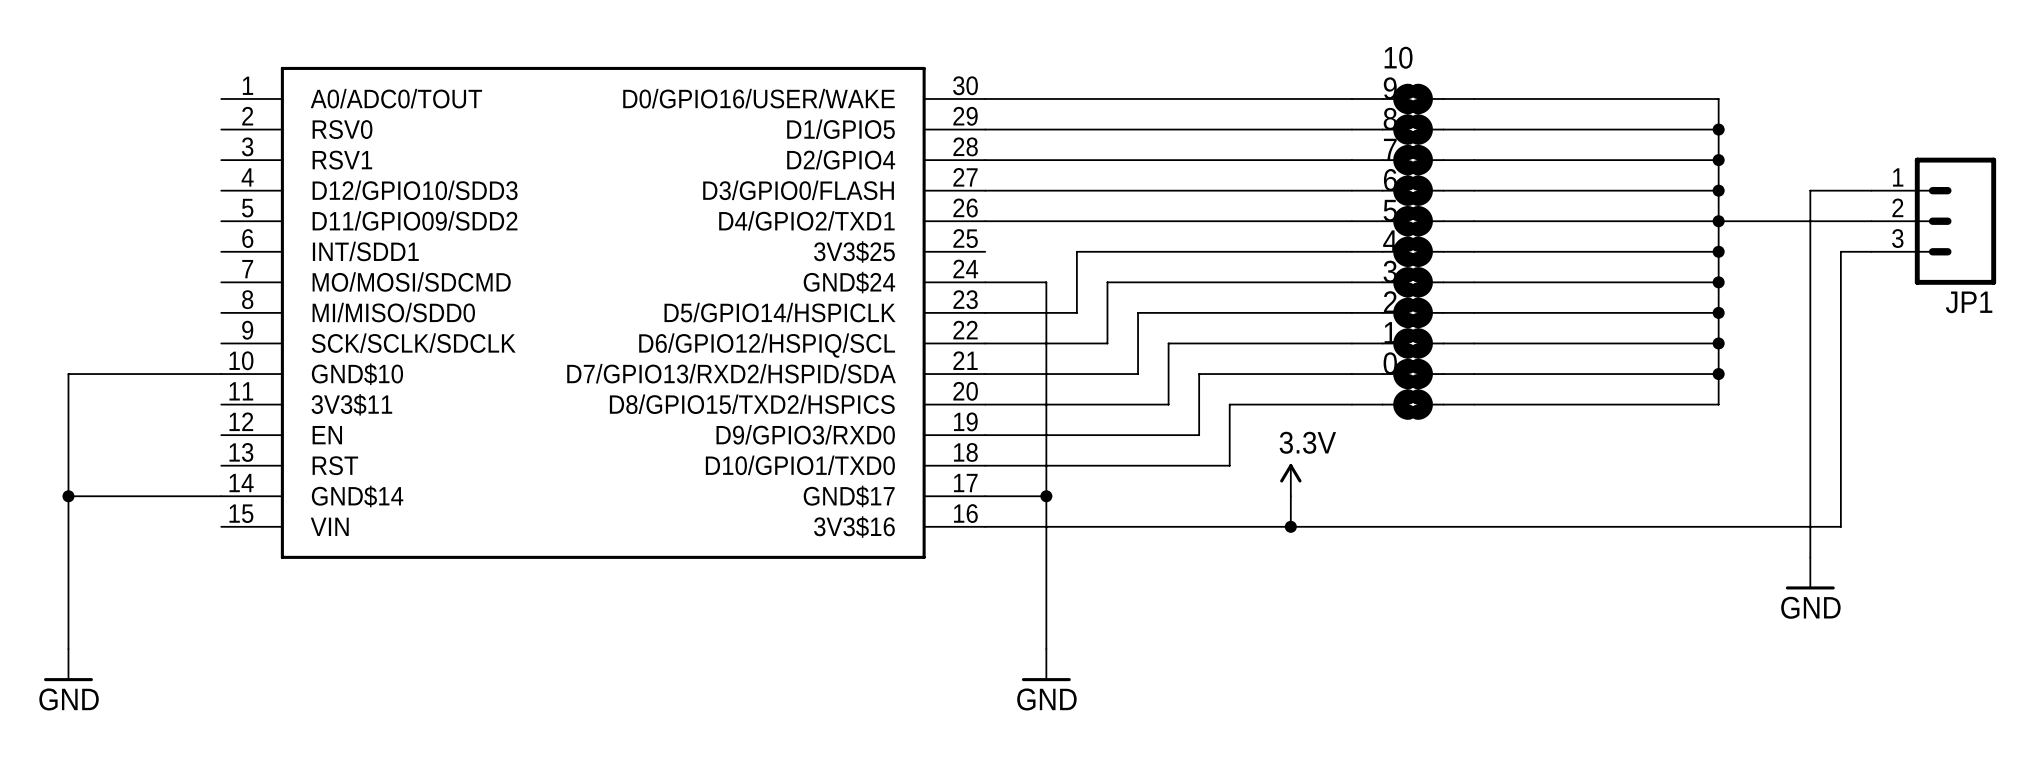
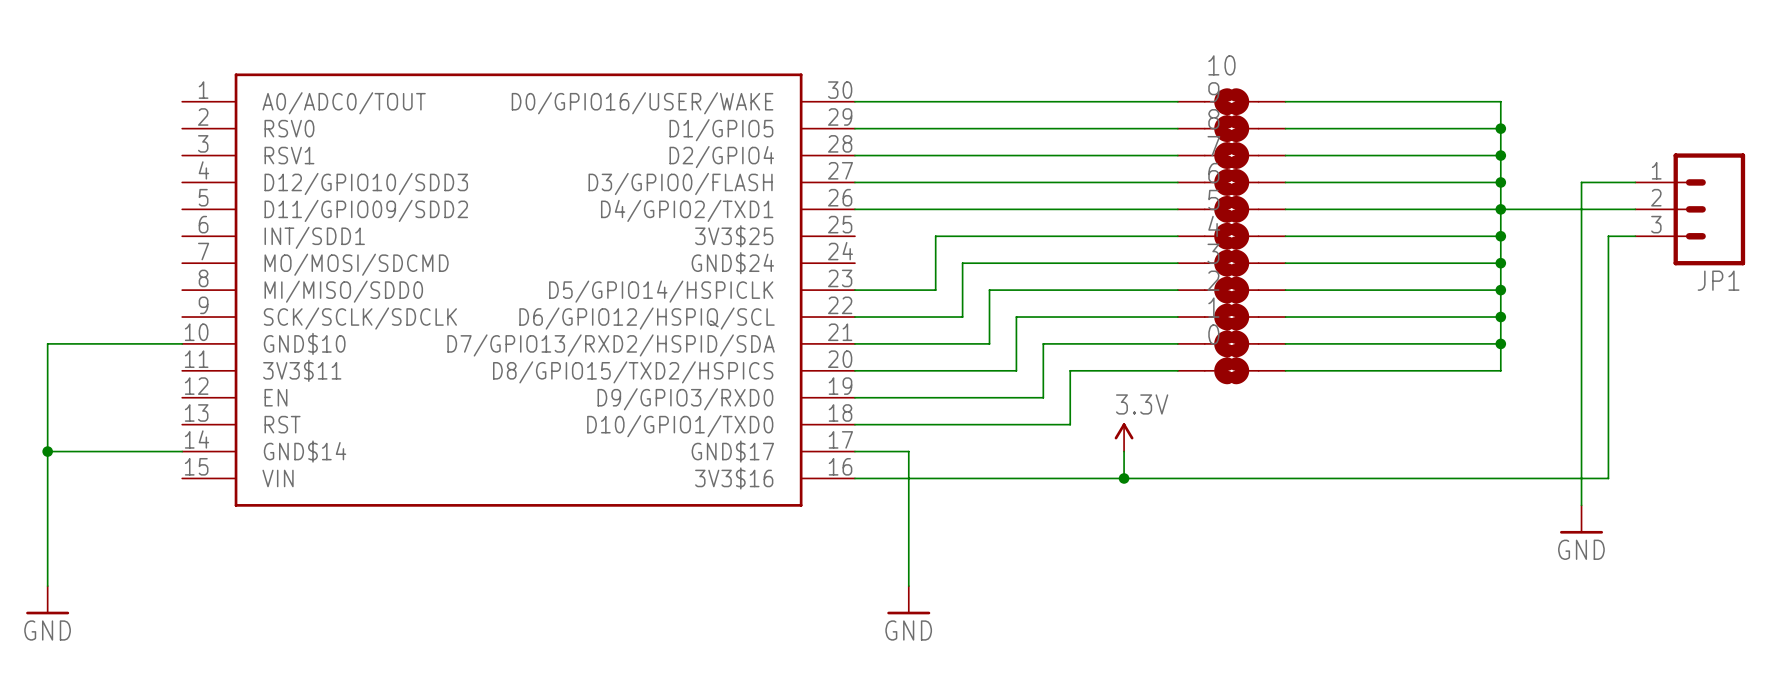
wire: (985, 282) (1046, 282) (1046, 496) -> none
junction: (1046, 496) -> none

